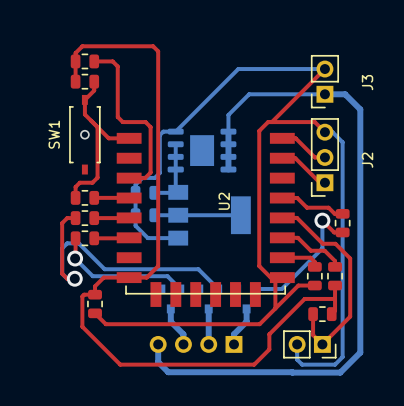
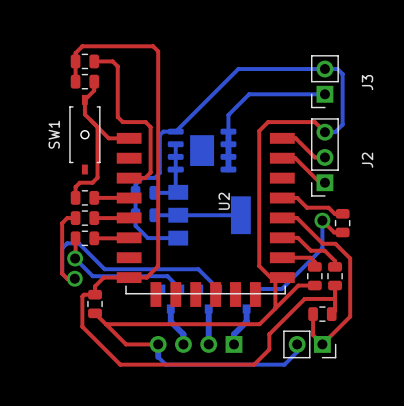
top track: (324, 69) (271, 122) -> none
bottom track: (324, 94) (345, 94) (360, 109) (360, 352) (340, 372) (168, 372) (158, 362) (158, 357) -> (297, 352) (284, 364) (165, 364) (158, 357)
bottom track: (332, 132) (342, 142) (342, 357) (335, 364) (302, 364) (297, 359) (297, 352) -> (332, 132) (335, 132) (342, 124) (342, 74) (337, 69) (324, 69)
top track: none -> (105, 324) (126, 344) (158, 344)

